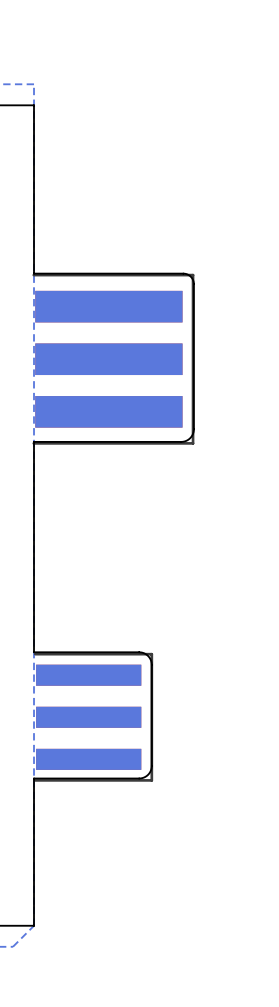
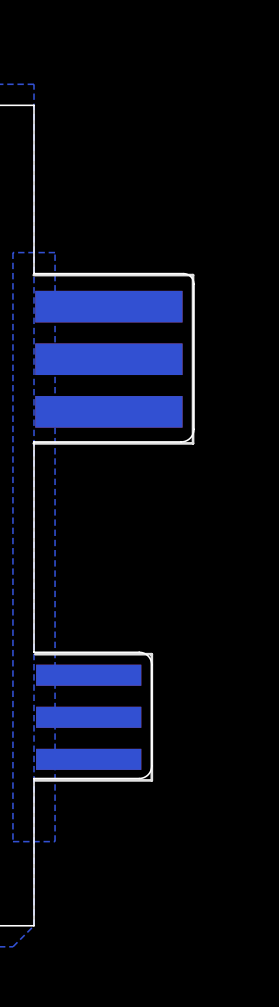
bottom zone outline: none -> (55, 252) (12, 252) (12, 841) (55, 841) (55, 252)

